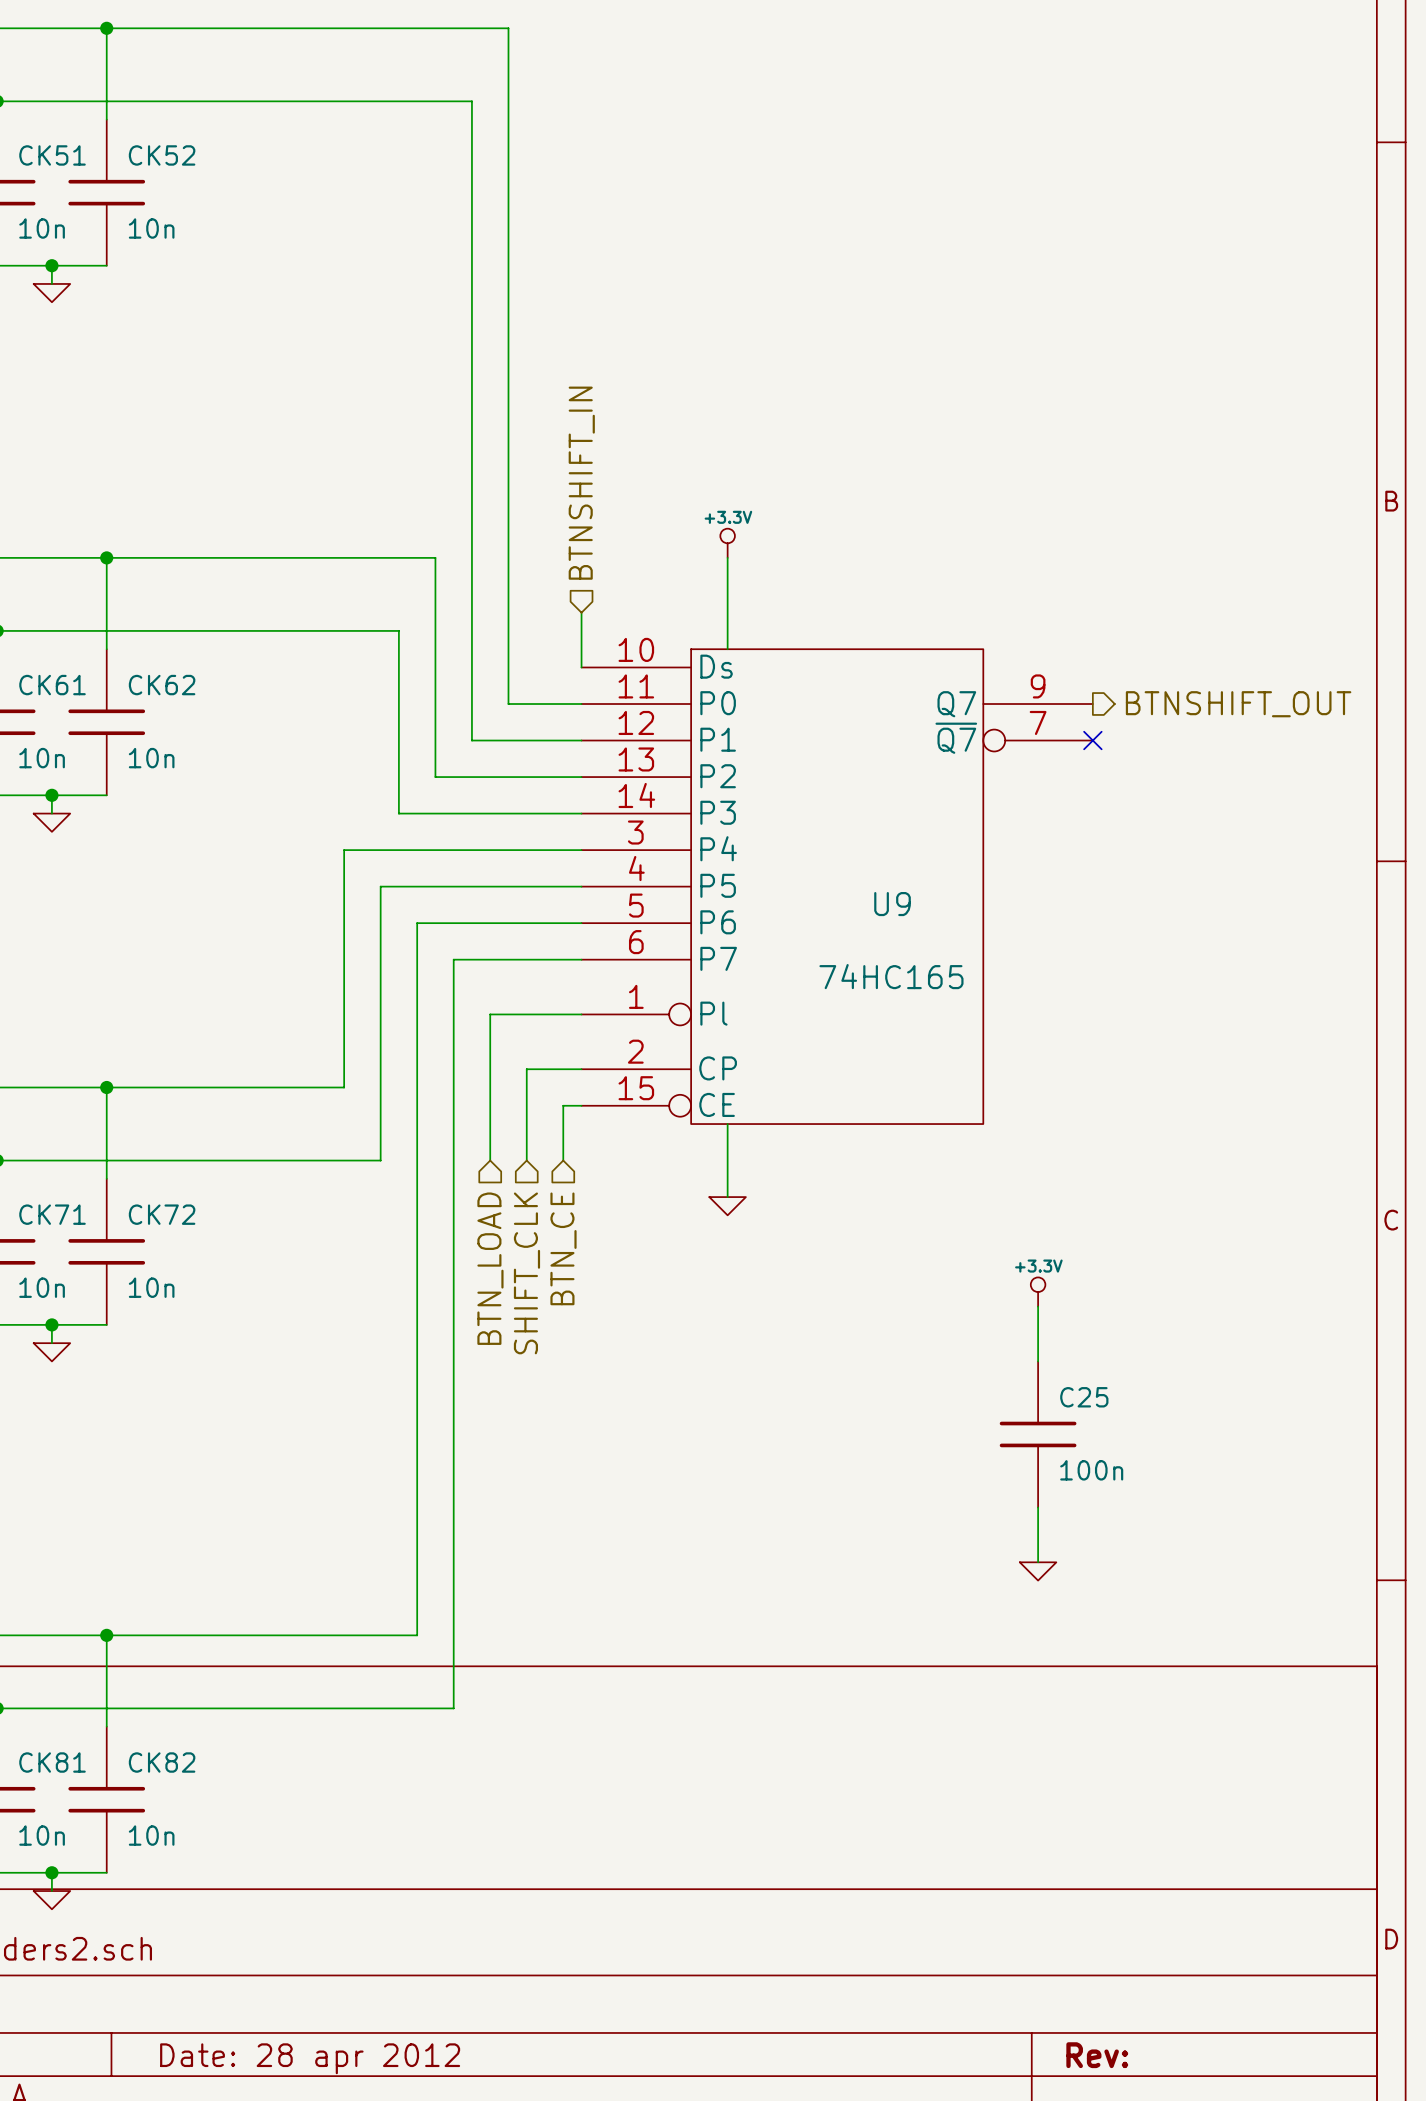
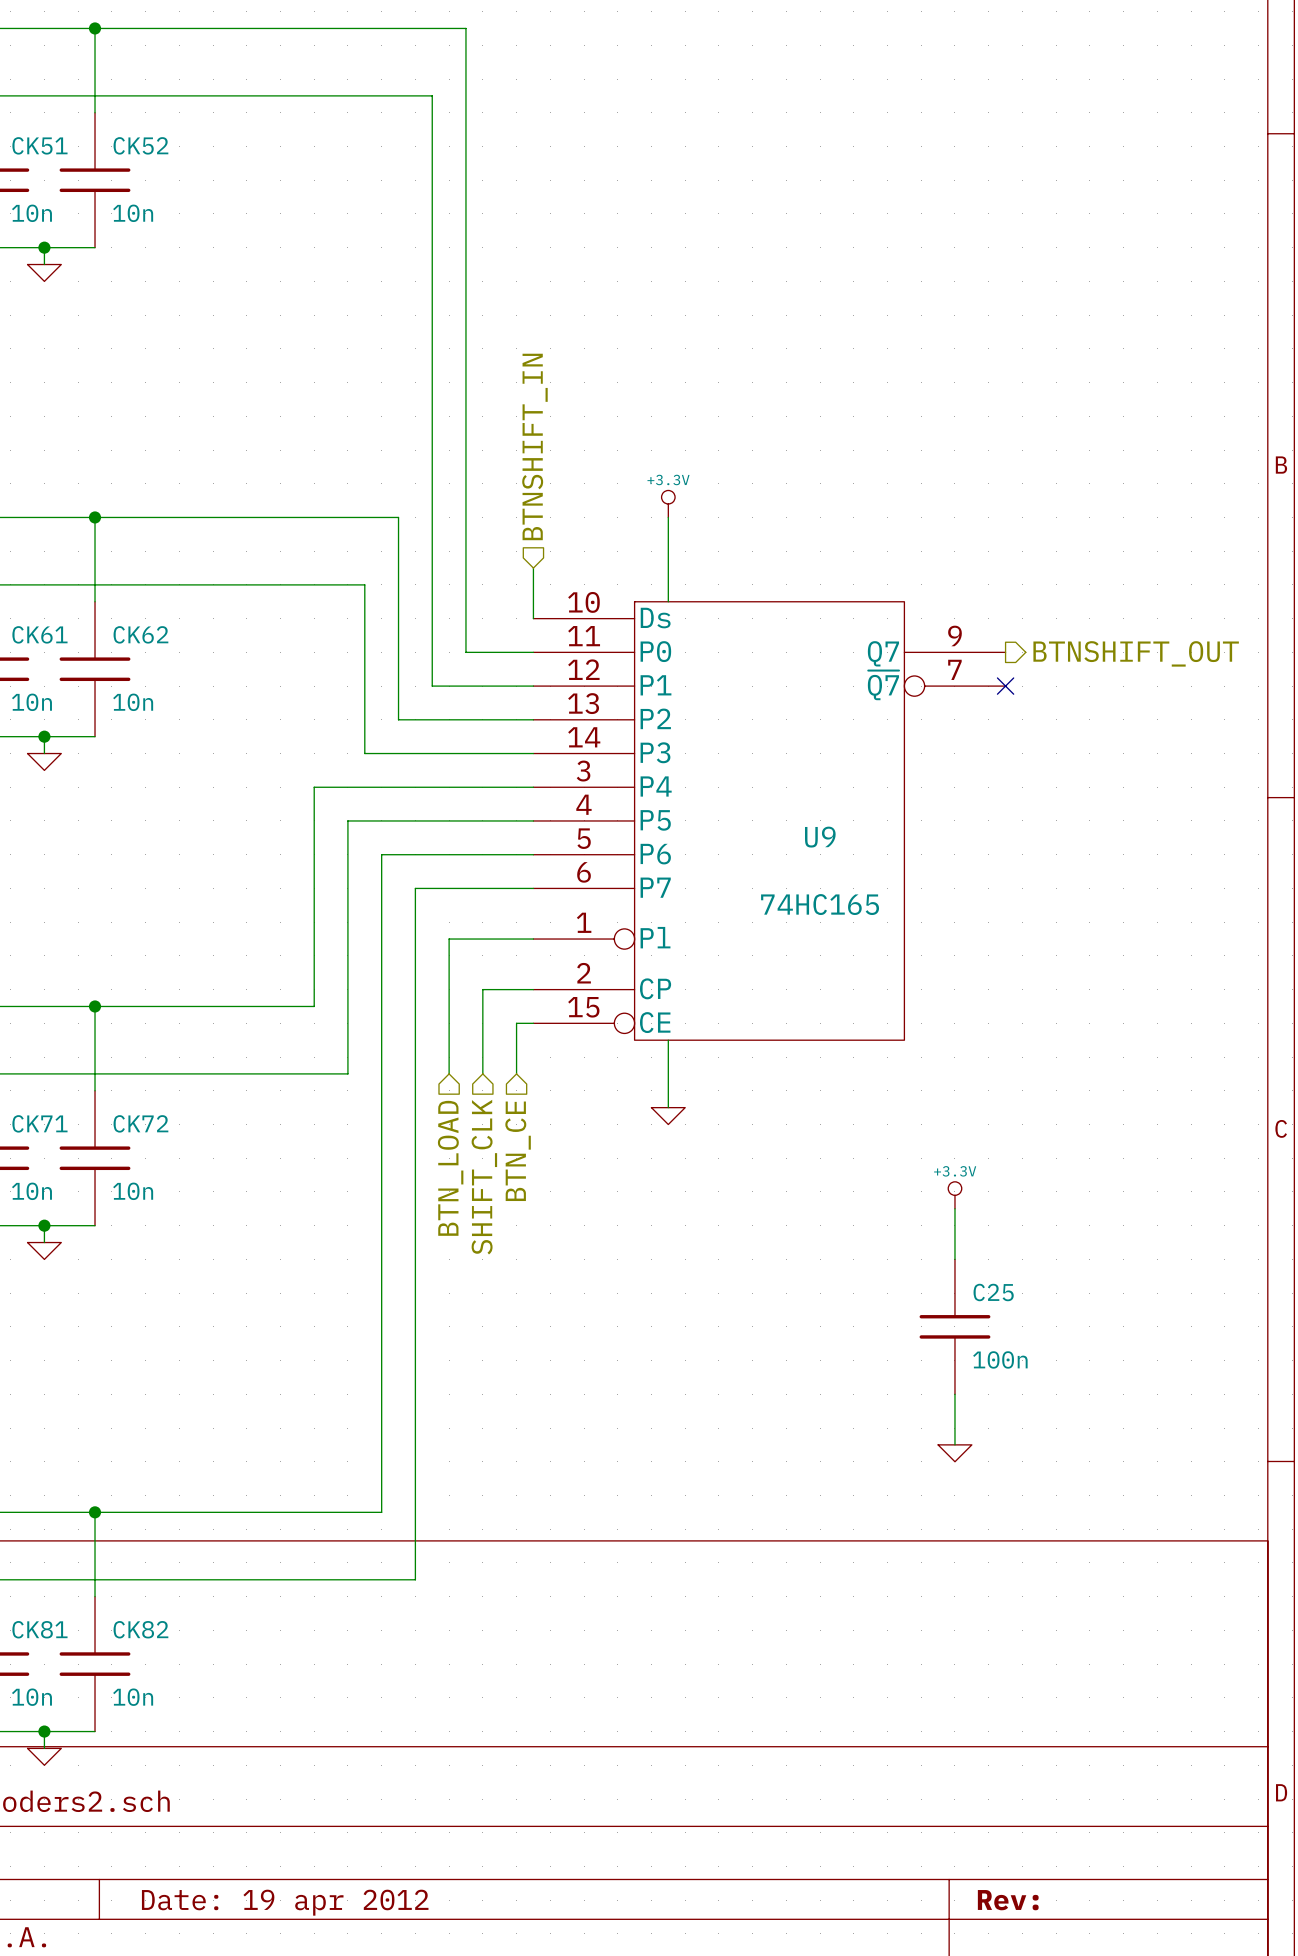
title block: Date: 28 apr 2012 (310, 2058) -> Date: 19 apr 2012 (285, 1902)

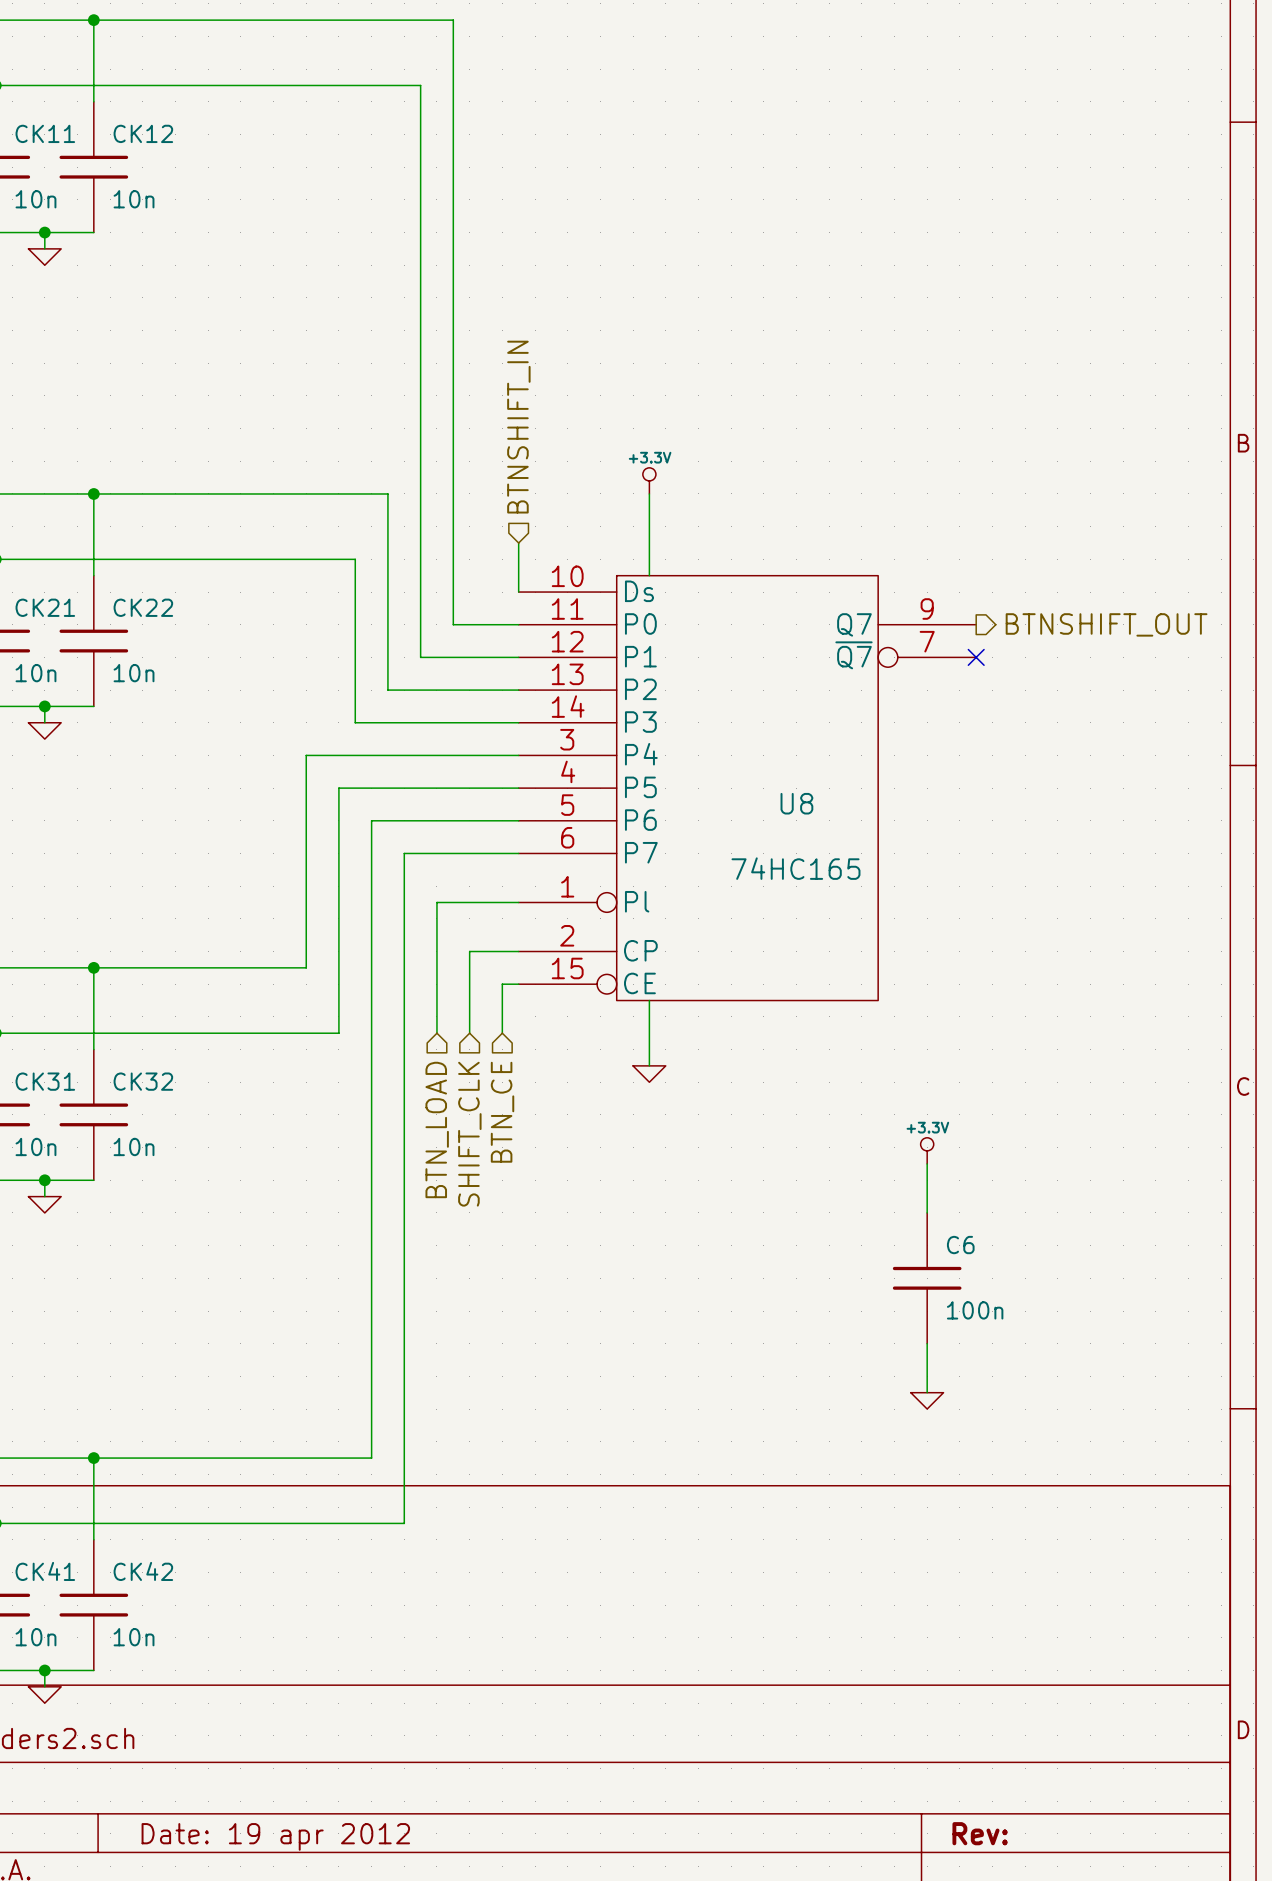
CK51 name: CK51 (39, 145) -> CK11 (45, 133)
CK52 name: CK52 (140, 145) -> CK12 (143, 133)
CK61 name: CK61 (39, 634) -> CK21 (45, 607)
CK62 name: CK62 (140, 634) -> CK22 (143, 607)
U9 name: U9 (820, 837) -> U8 (796, 803)
CK71 name: CK71 (39, 1123) -> CK31 (45, 1081)
CK72 name: CK72 (140, 1123) -> CK32 (143, 1081)
C25 name: C25 (993, 1292) -> C6 (960, 1245)
CK81 name: CK81 (39, 1629) -> CK41 (45, 1571)
CK82 name: CK82 (140, 1629) -> CK42 (143, 1571)

